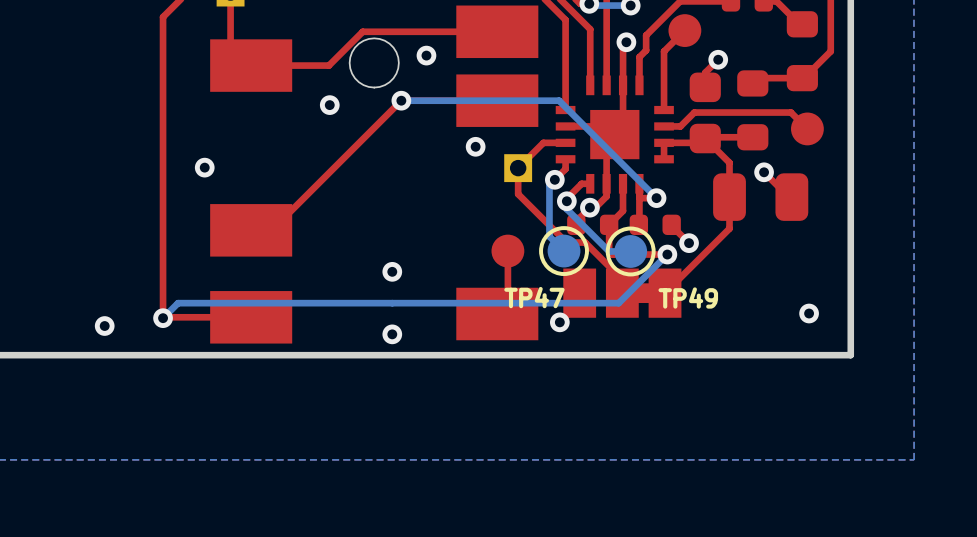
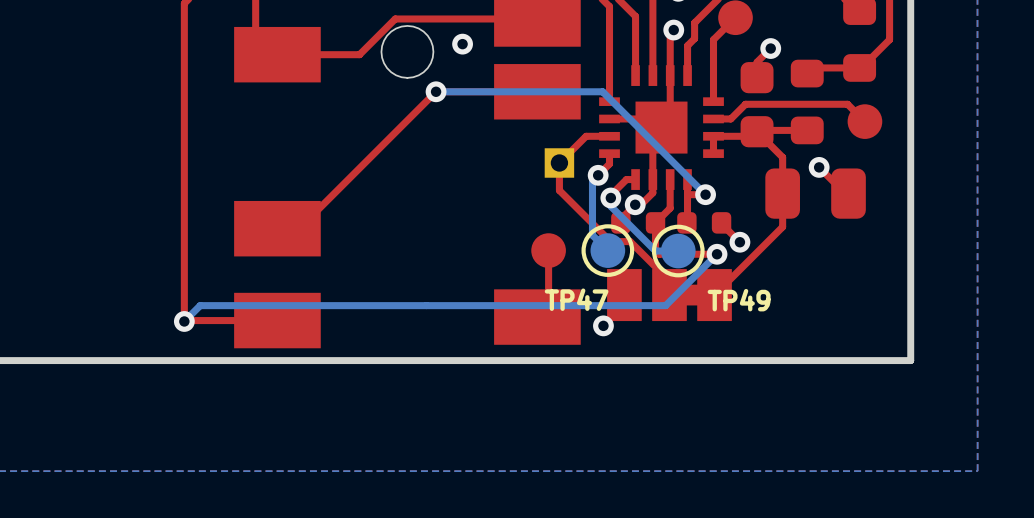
via: (329, 105) -> none
via: (475, 146) -> none
via: (204, 167) -> none
via: (392, 271) -> none
via: (809, 313) -> none
via: (104, 326) -> none
via: (392, 334) -> none

